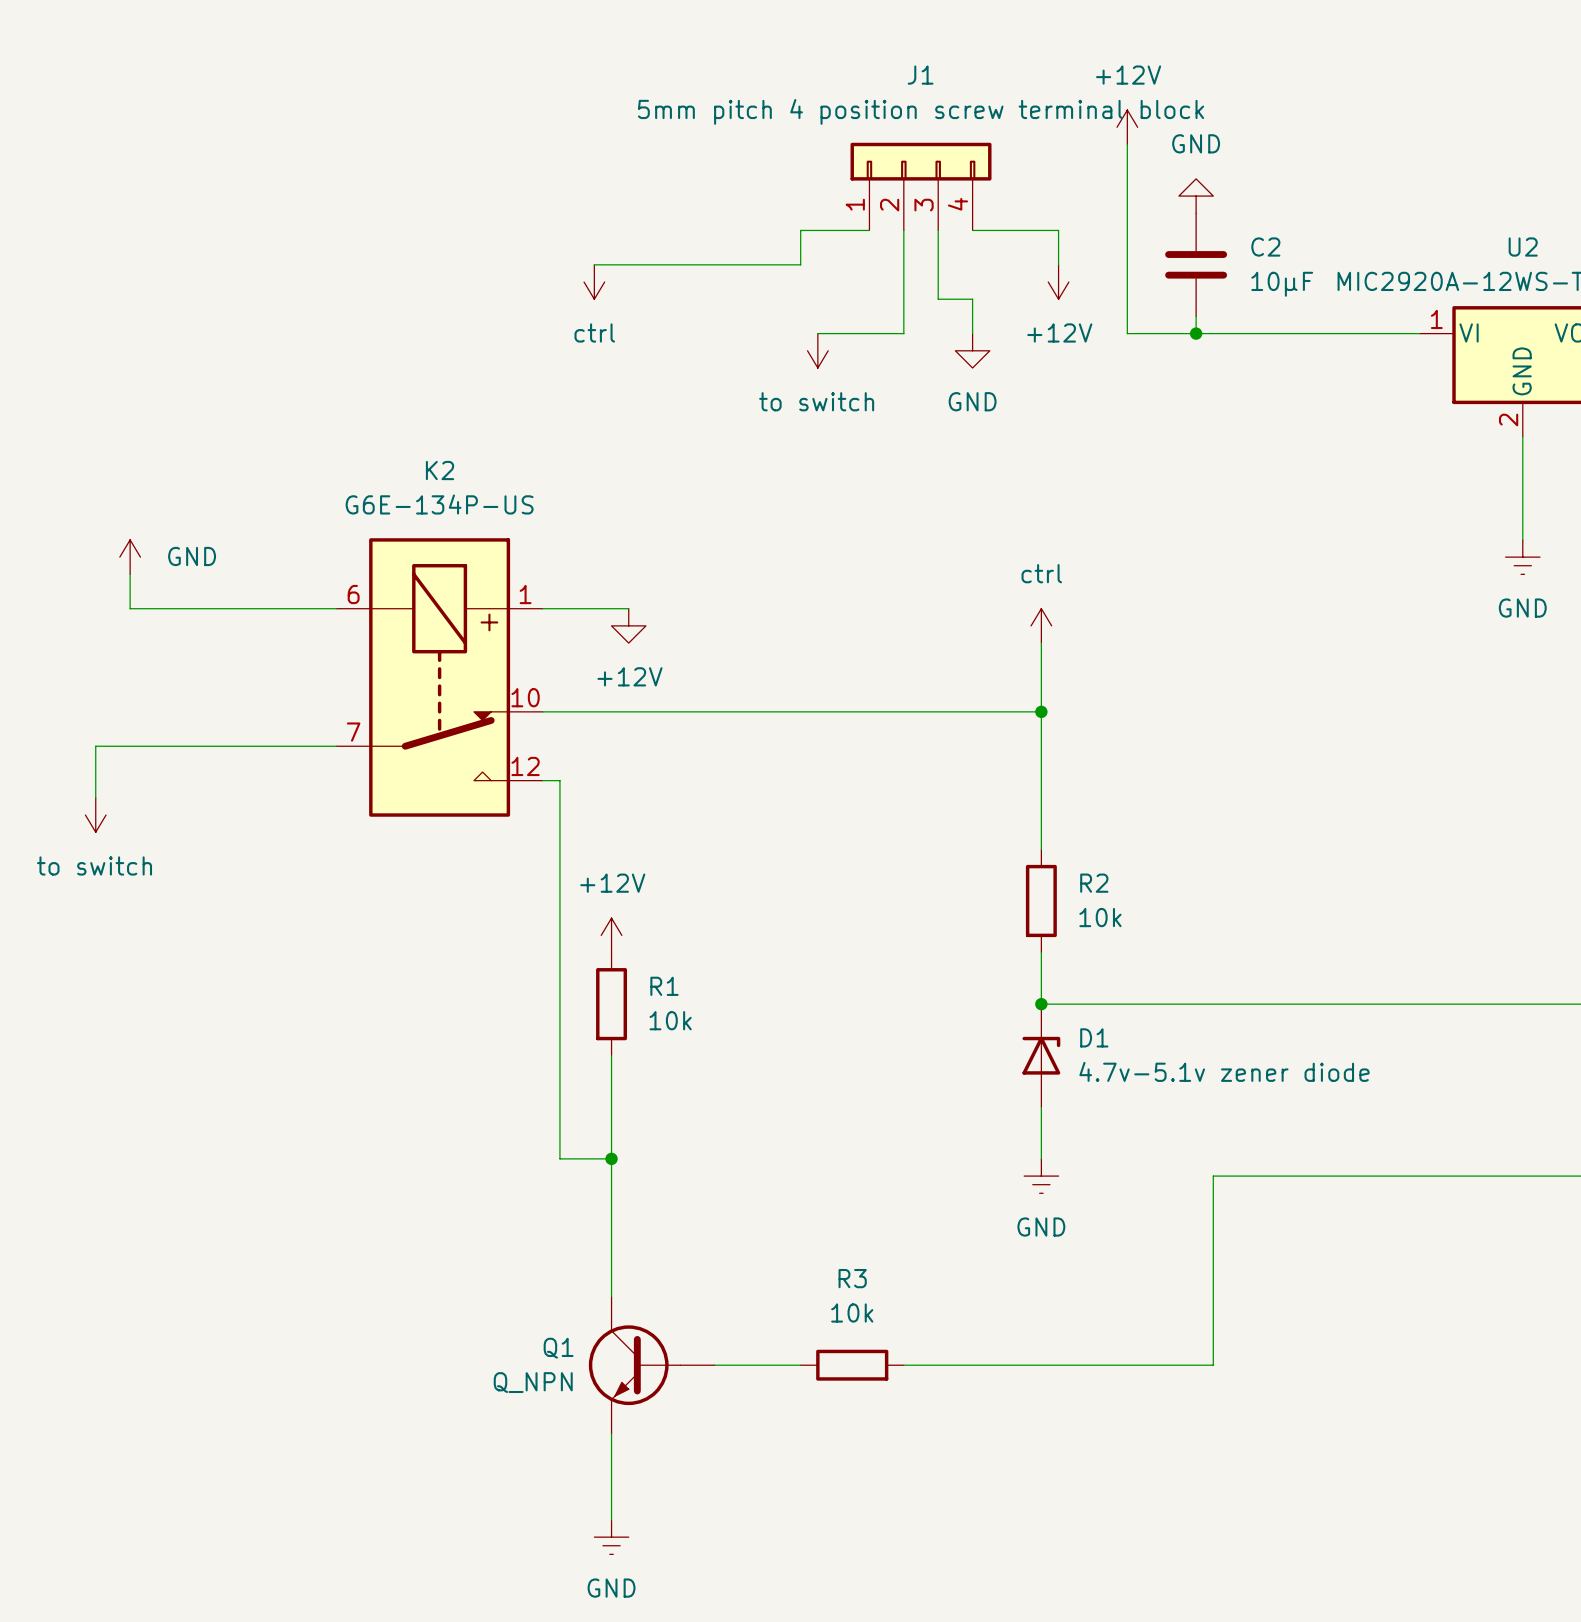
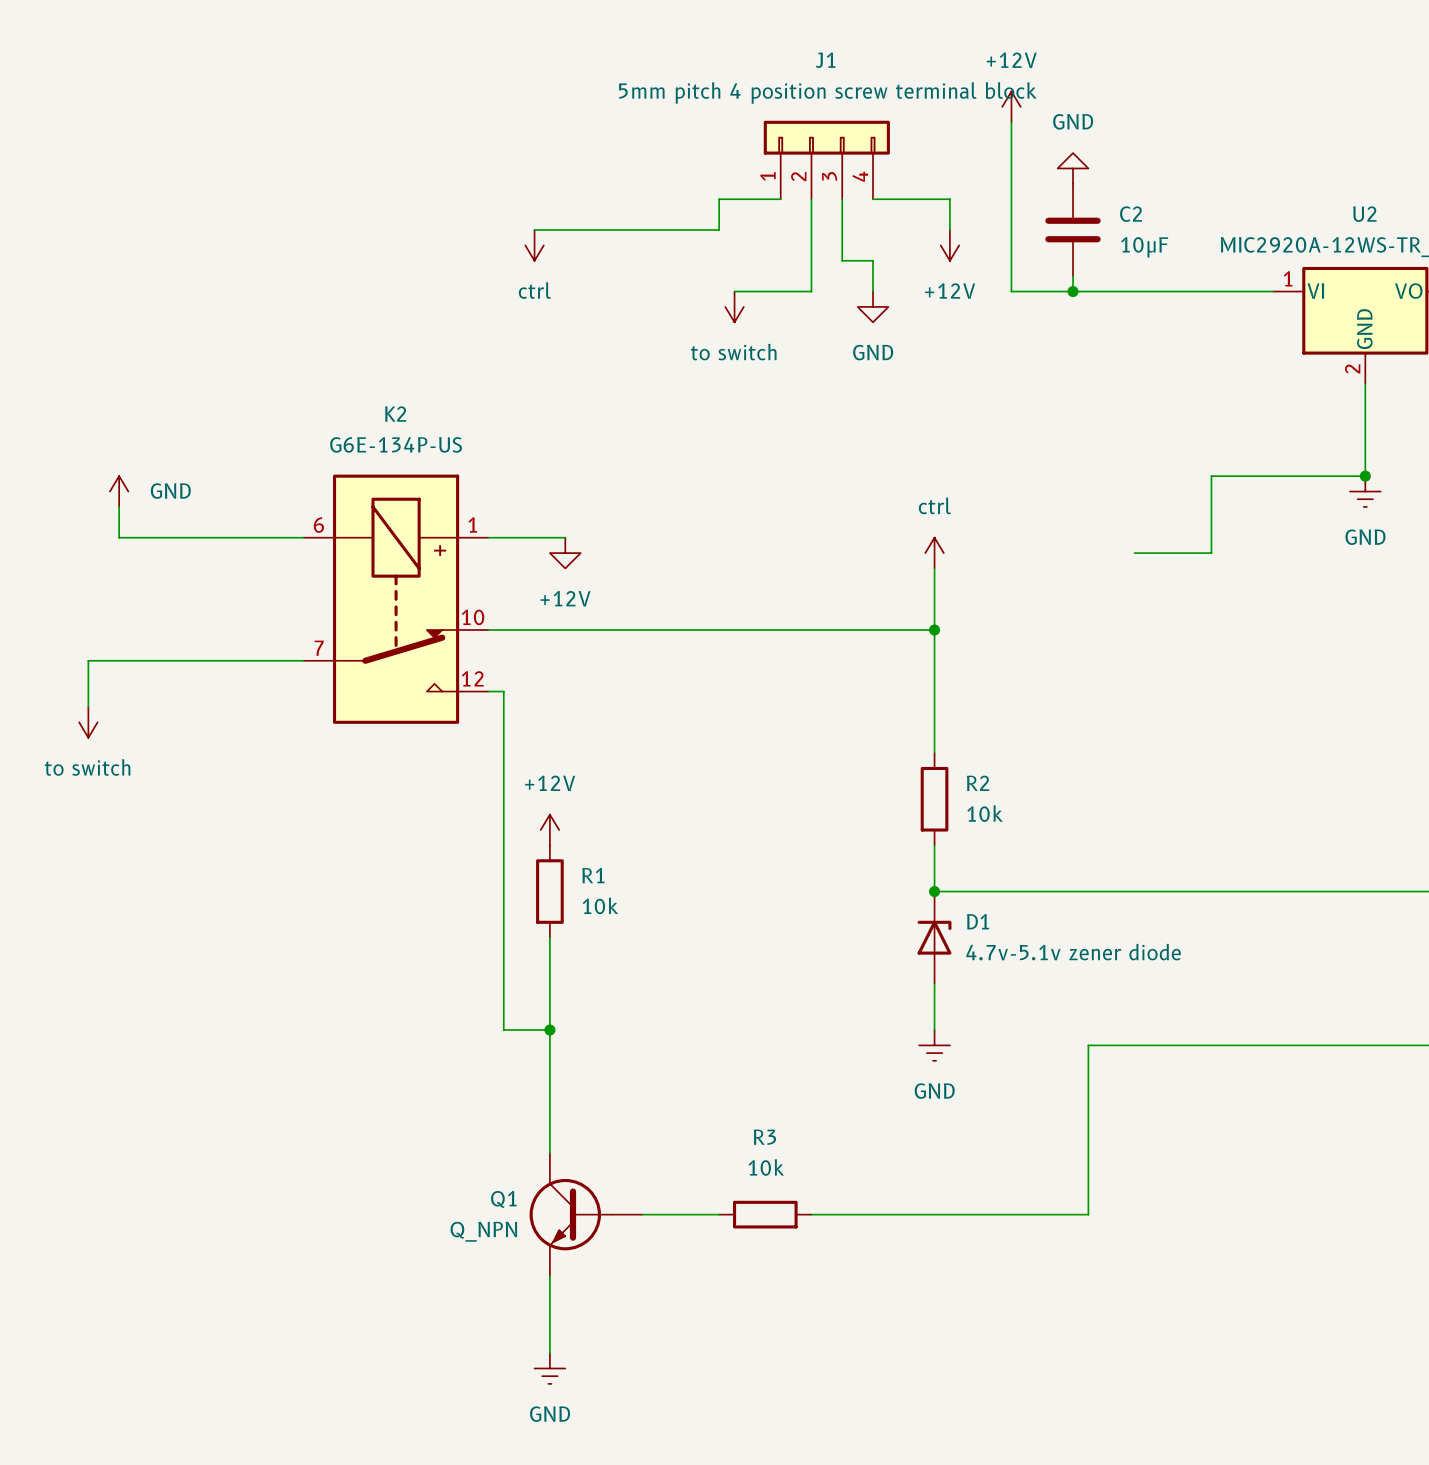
wire: none -> (1365, 476) (1211, 476) (1211, 553) (1134, 553)
junction: none -> (1365, 476)

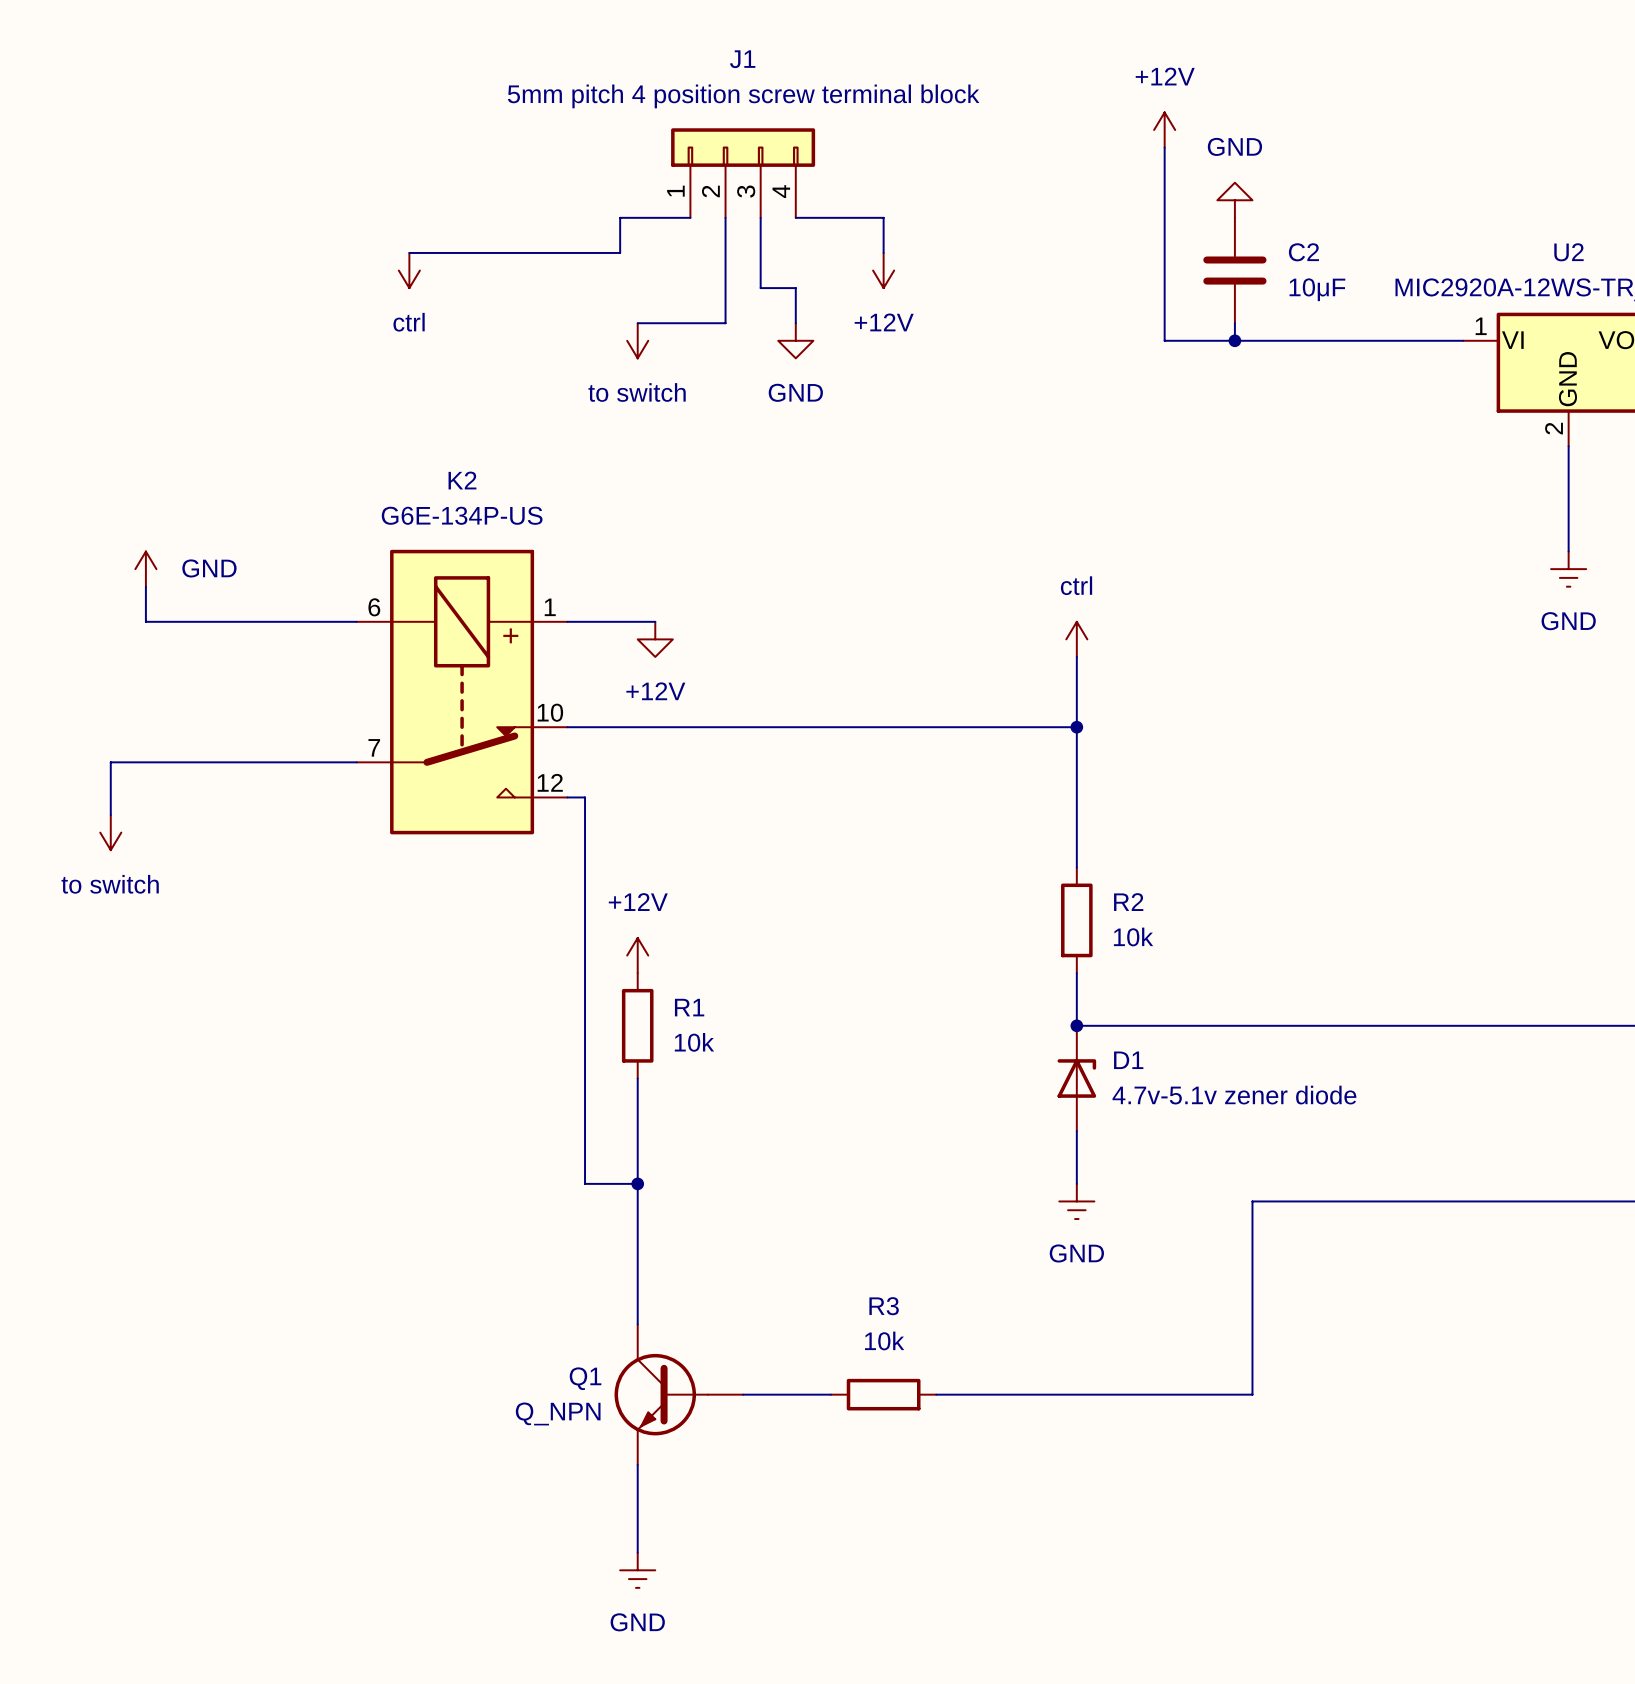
J1 position: (826, 160) -> (743, 173)
wire: (780, 199) (719, 199) (719, 230) (534, 230) -> (690, 217) (620, 217) (620, 252) (409, 252)
wire: (811, 199) (811, 291) (734, 291) -> (725, 217) (725, 323) (637, 323)
wire: (842, 199) (842, 260) (873, 260) (873, 291) -> (760, 217) (760, 288) (795, 288) (795, 323)
wire: (873, 199) (949, 199) (949, 230) -> (795, 217) (883, 217) (883, 252)
power symbol position: ctrl (534, 245) -> ctrl (409, 270)
power symbol position: +12V (949, 245) -> +12V (883, 270)
power symbol position: to switch (734, 306) -> to switch (637, 340)
power symbol position: GND (873, 306) -> GND (795, 340)
wire: (1365, 476) (1211, 476) (1211, 553) (1134, 553) -> none
junction: (1365, 476) -> none

